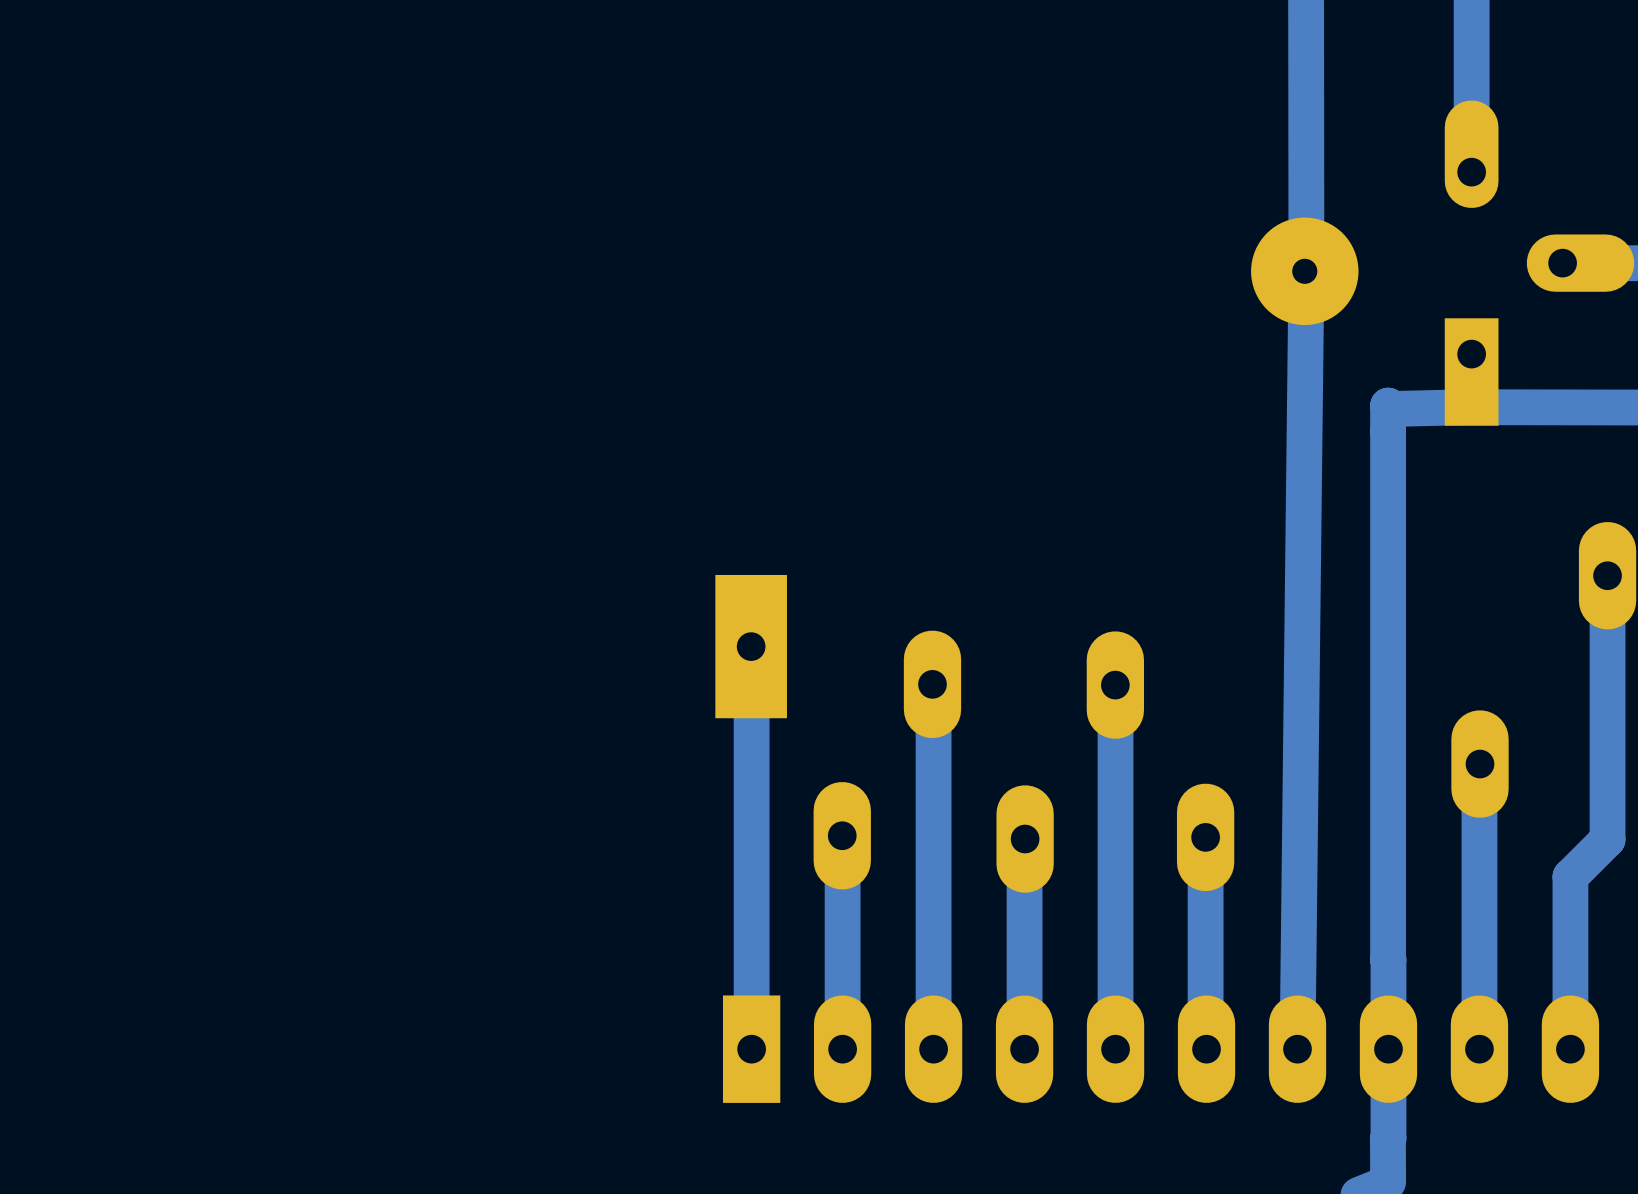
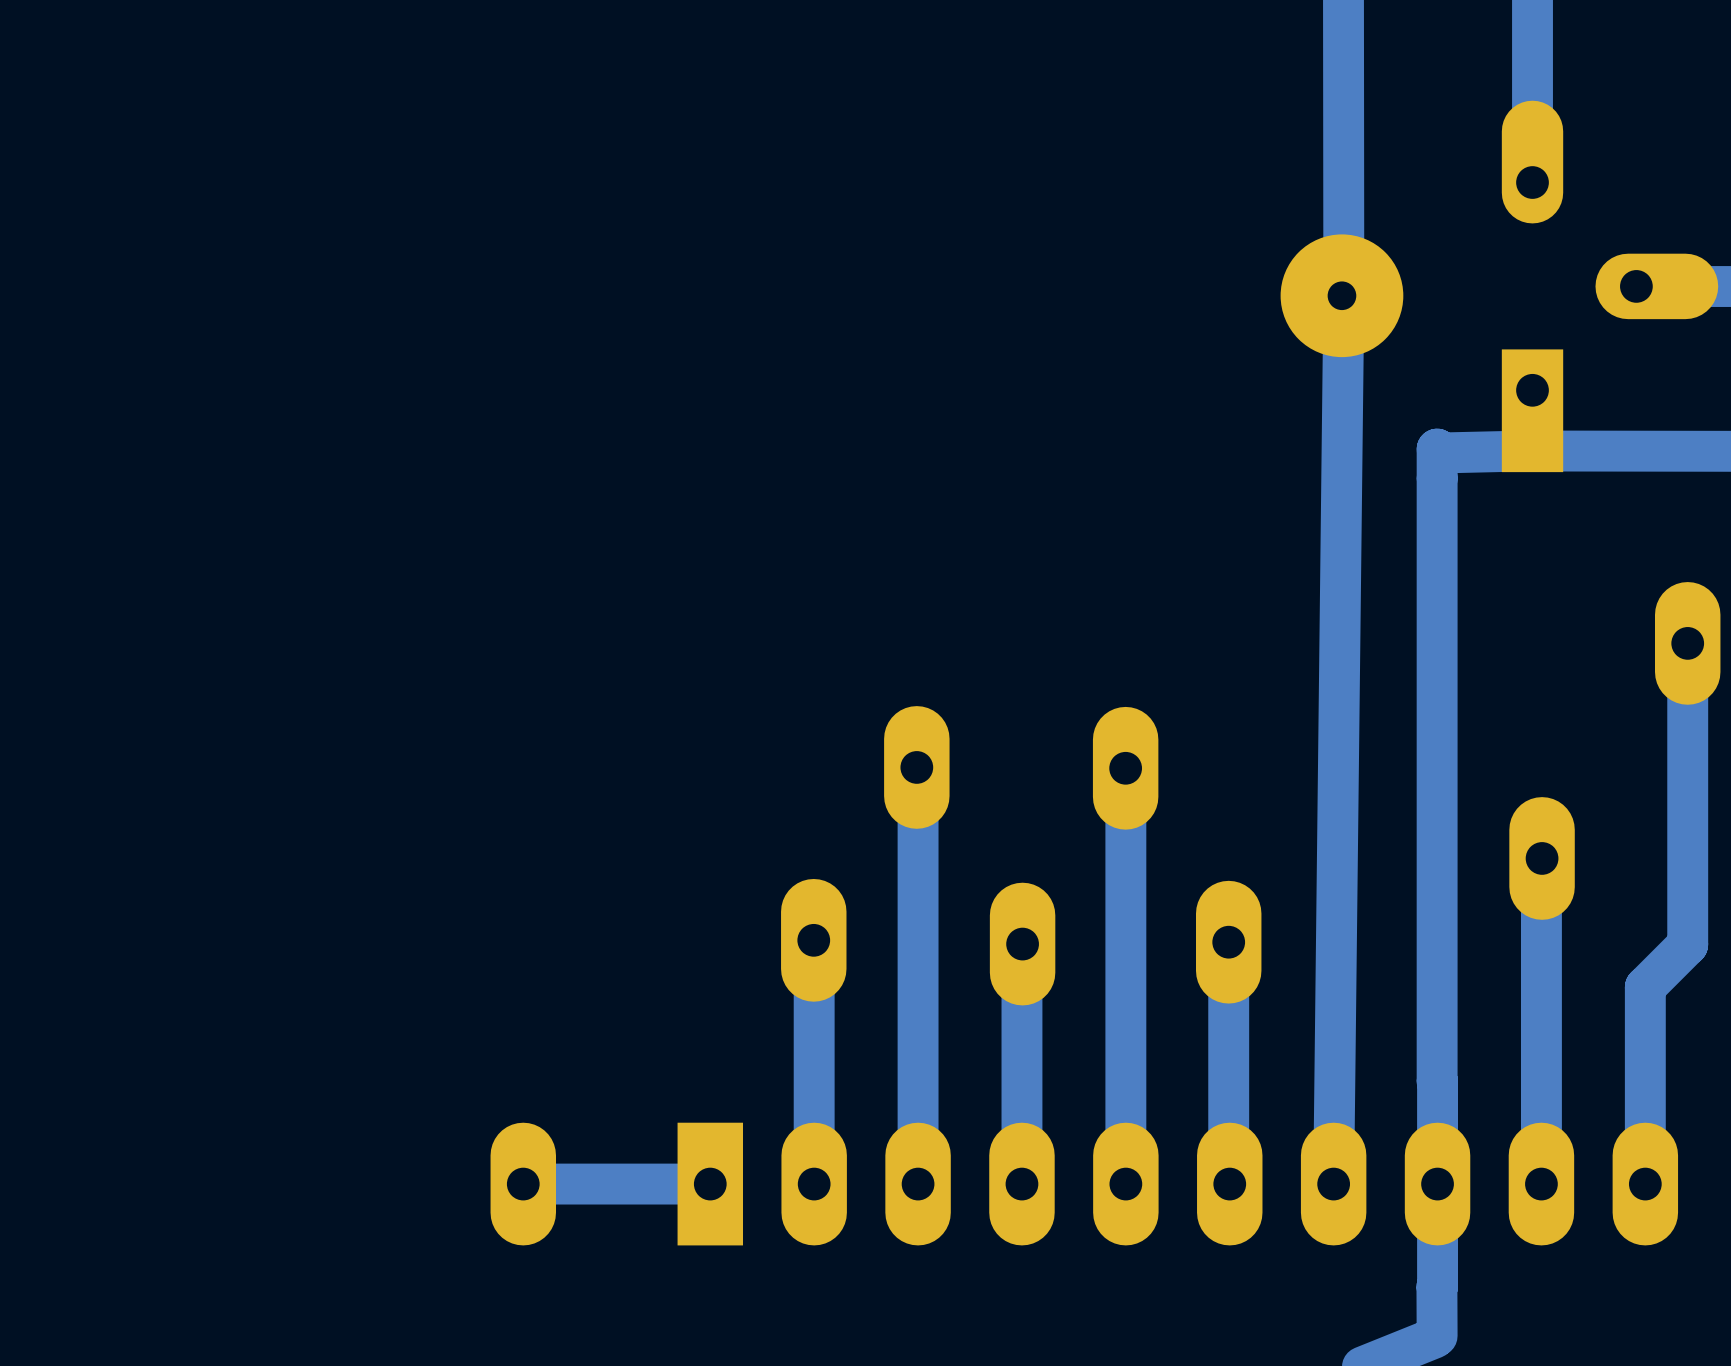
part: (751, 646) -> none
track: (751, 647) (751, 1049) -> (523, 1184) (710, 1184)
part: none -> (523, 1184)

